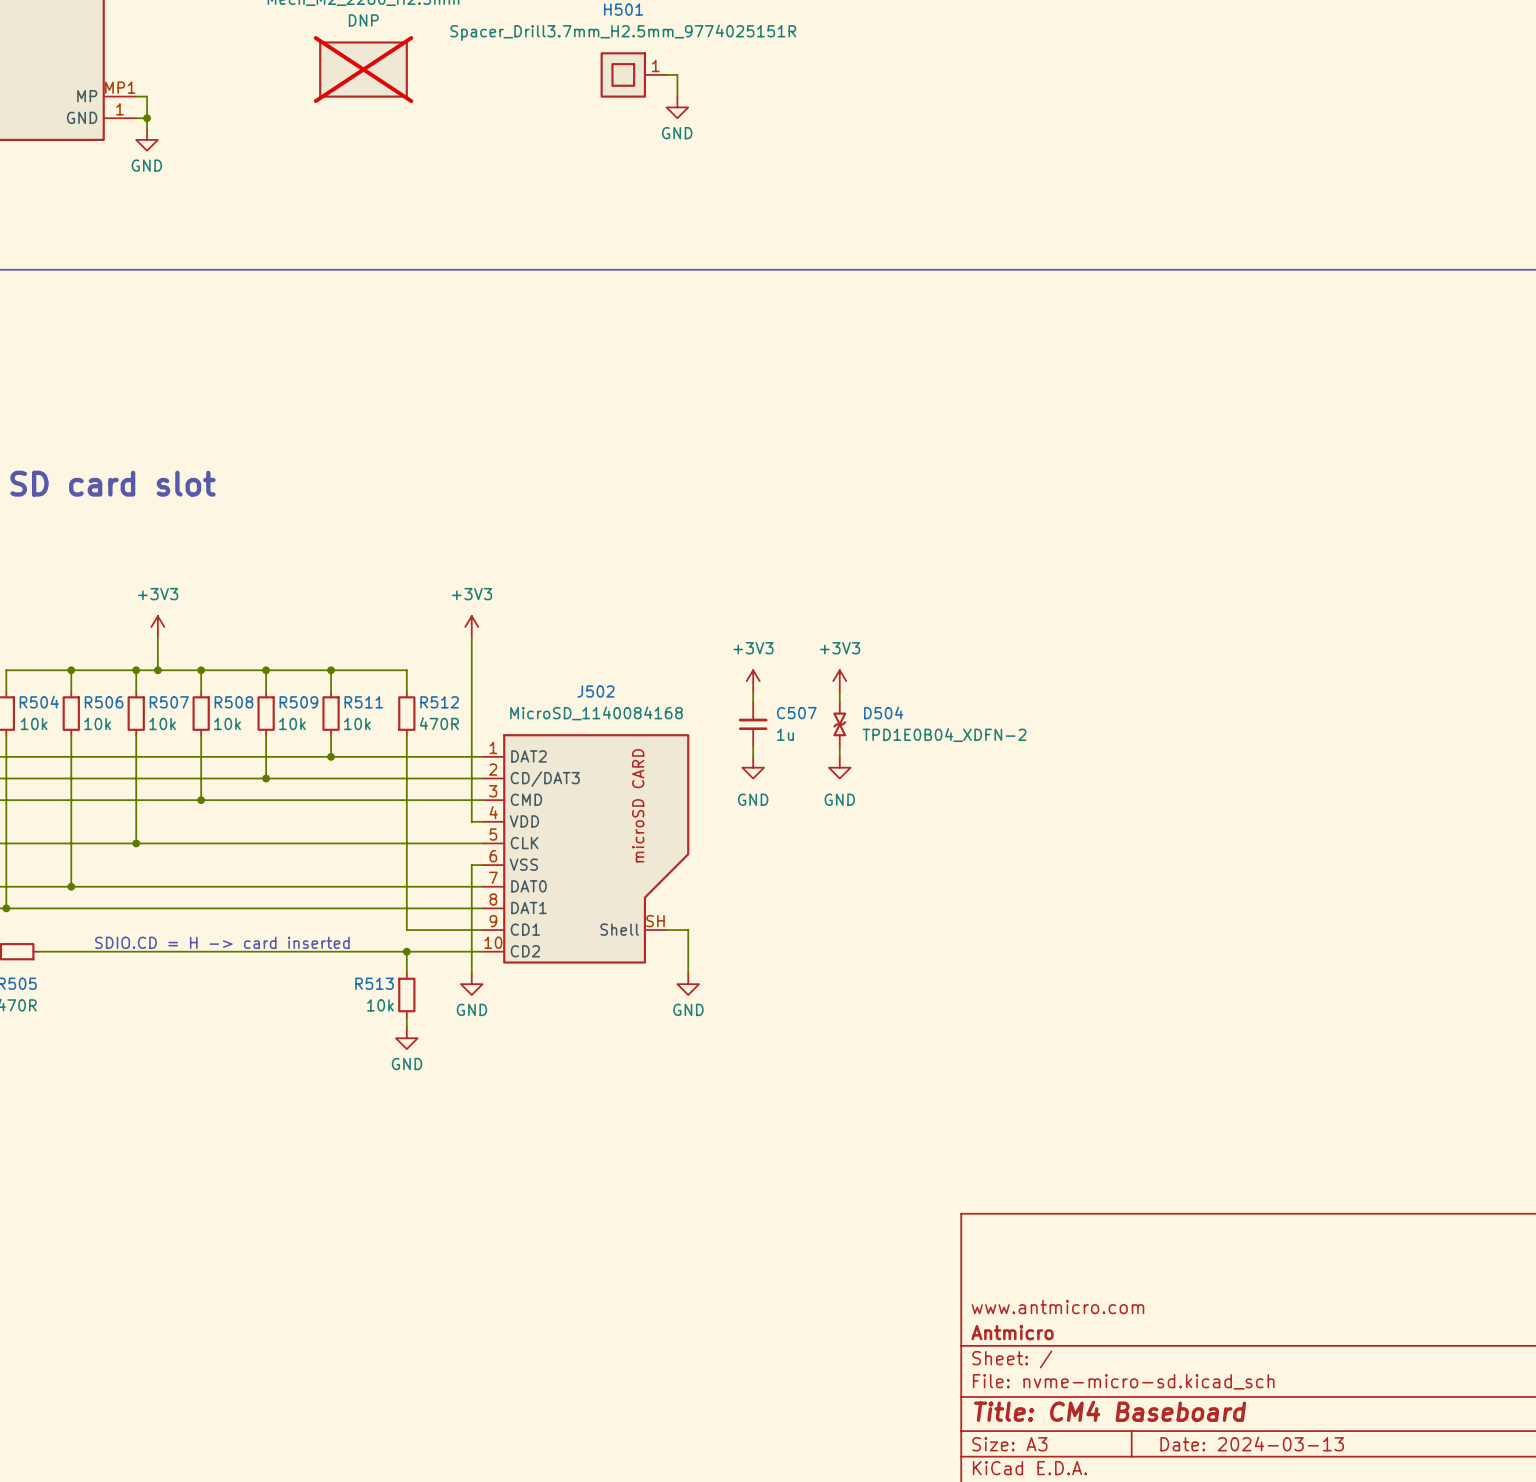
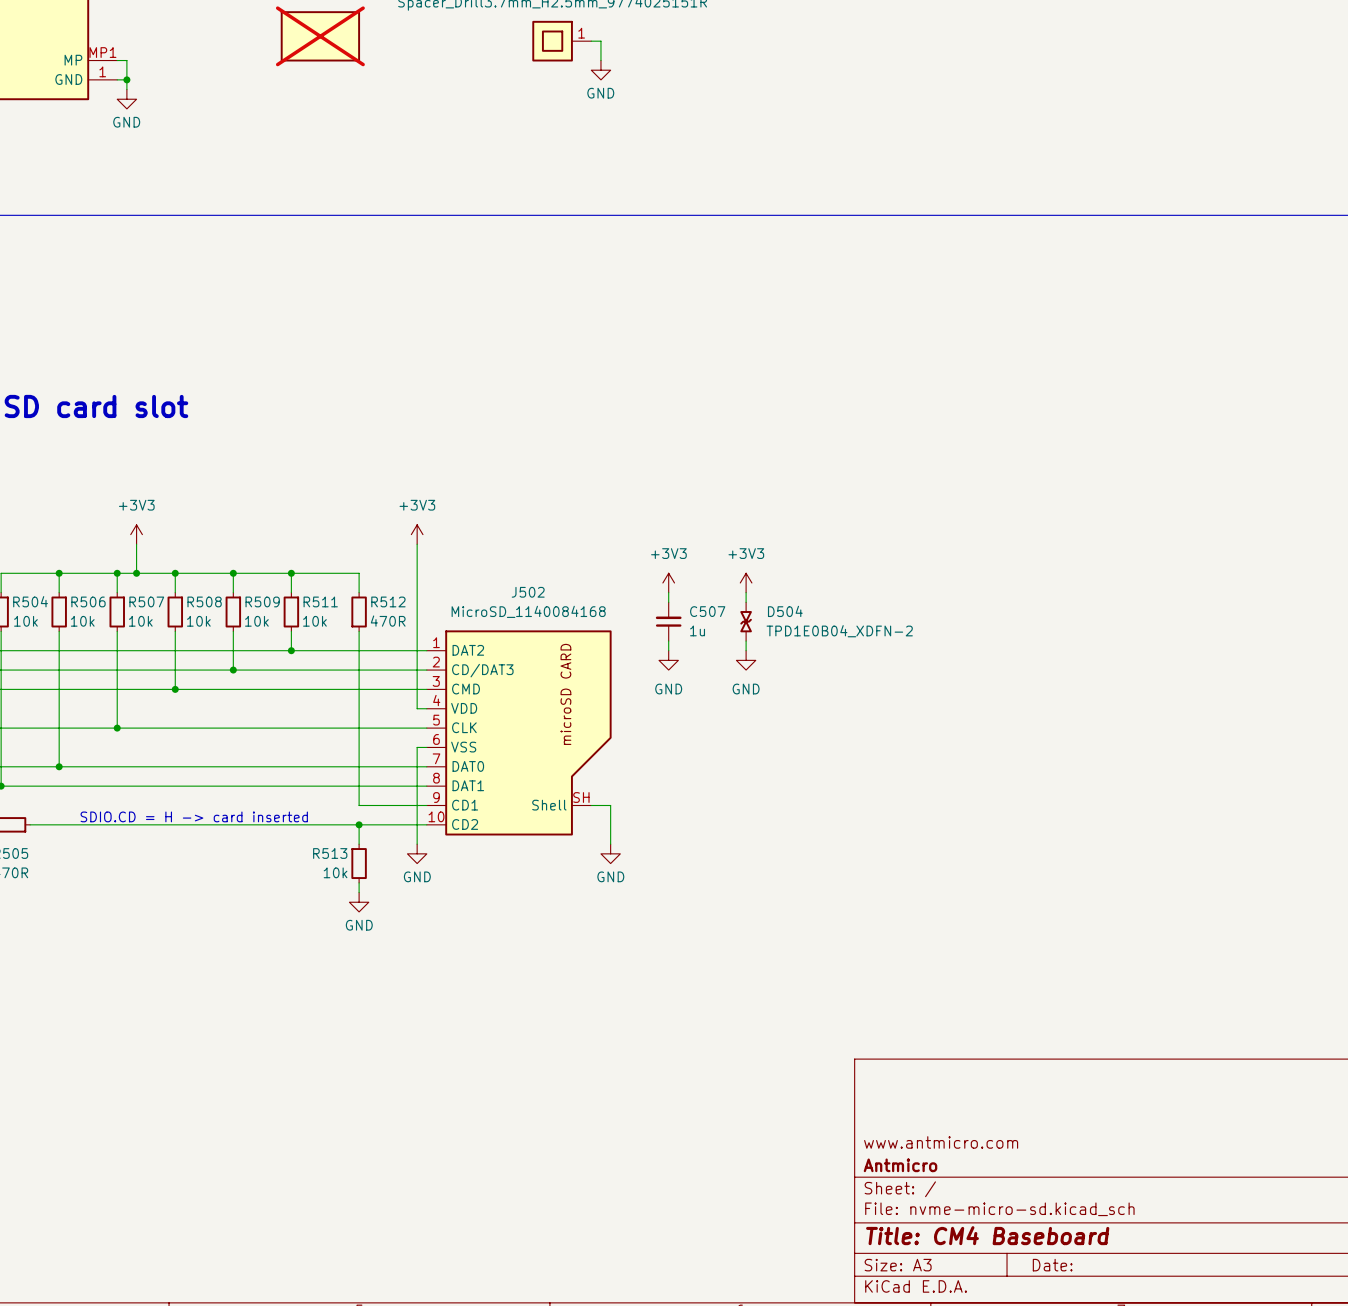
title block: Date: 2024-03-13 (1252, 1443) -> Date: (1052, 1265)

